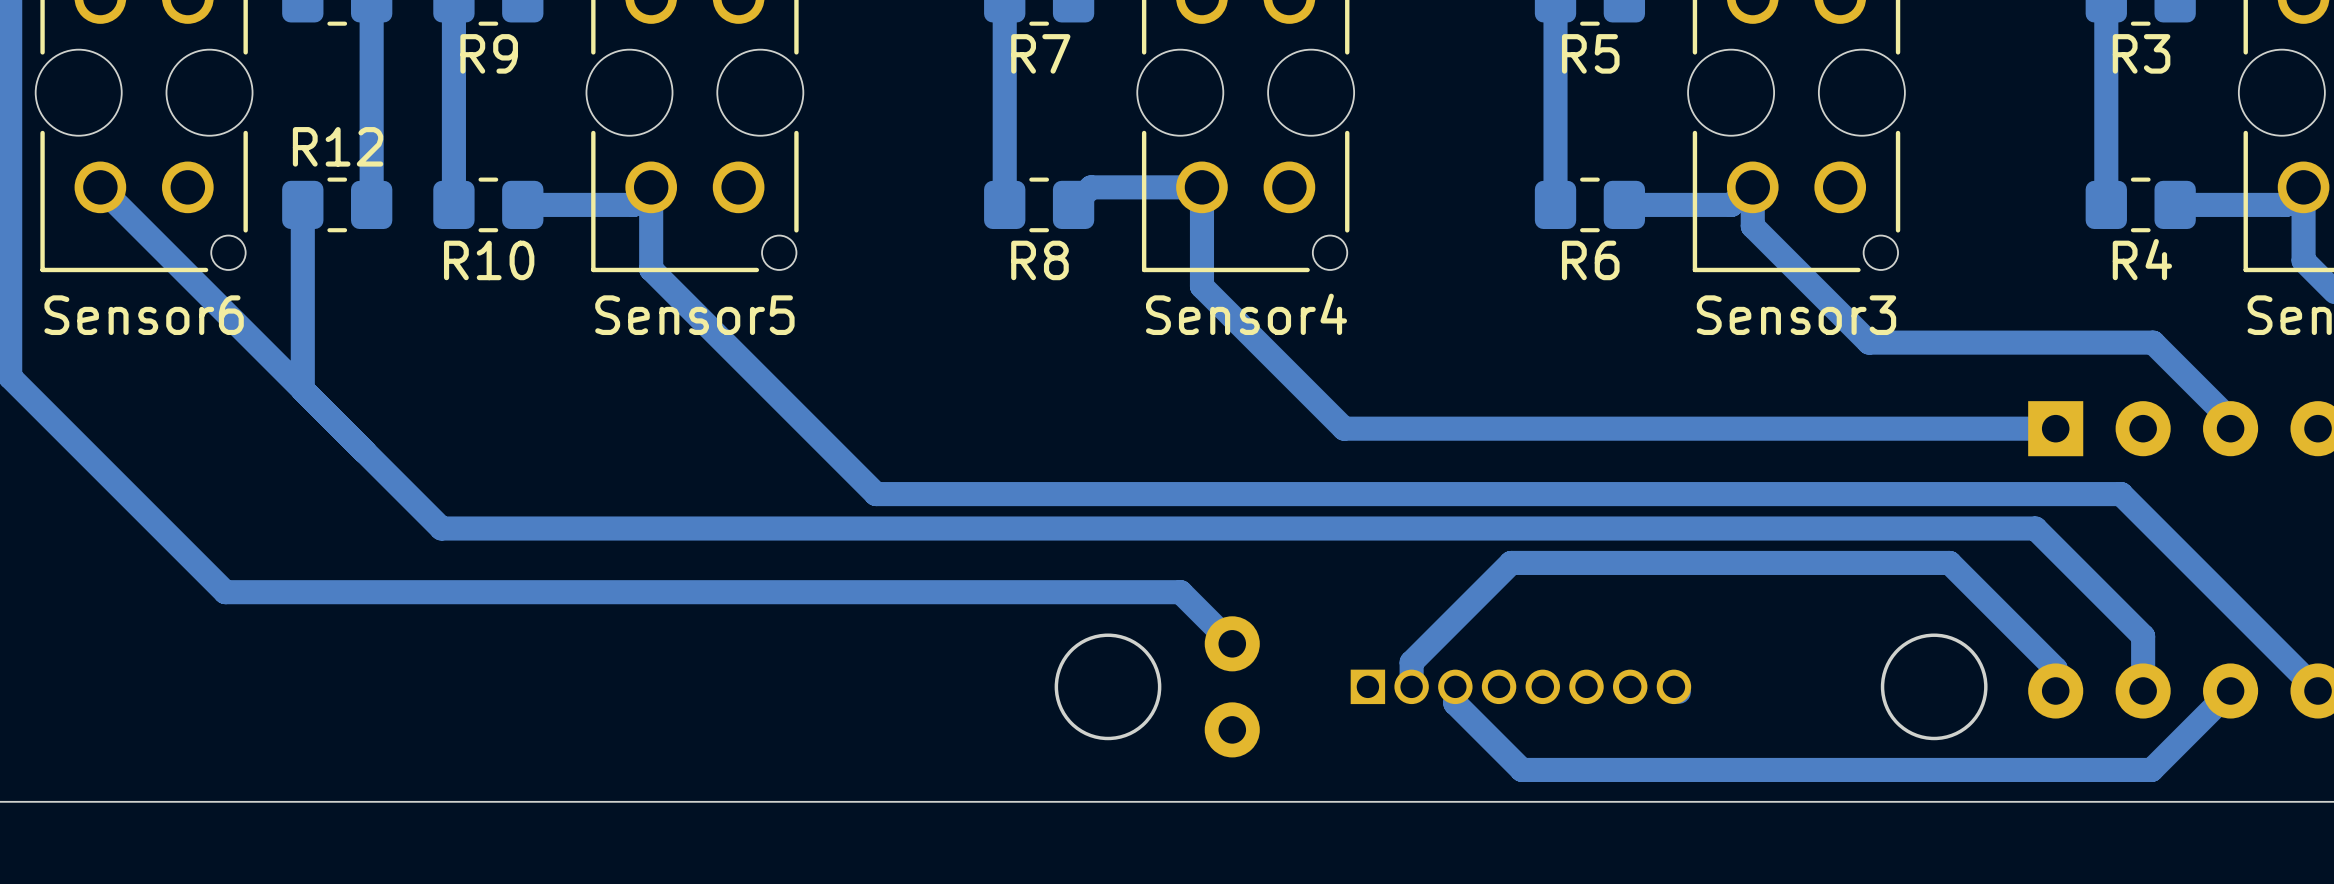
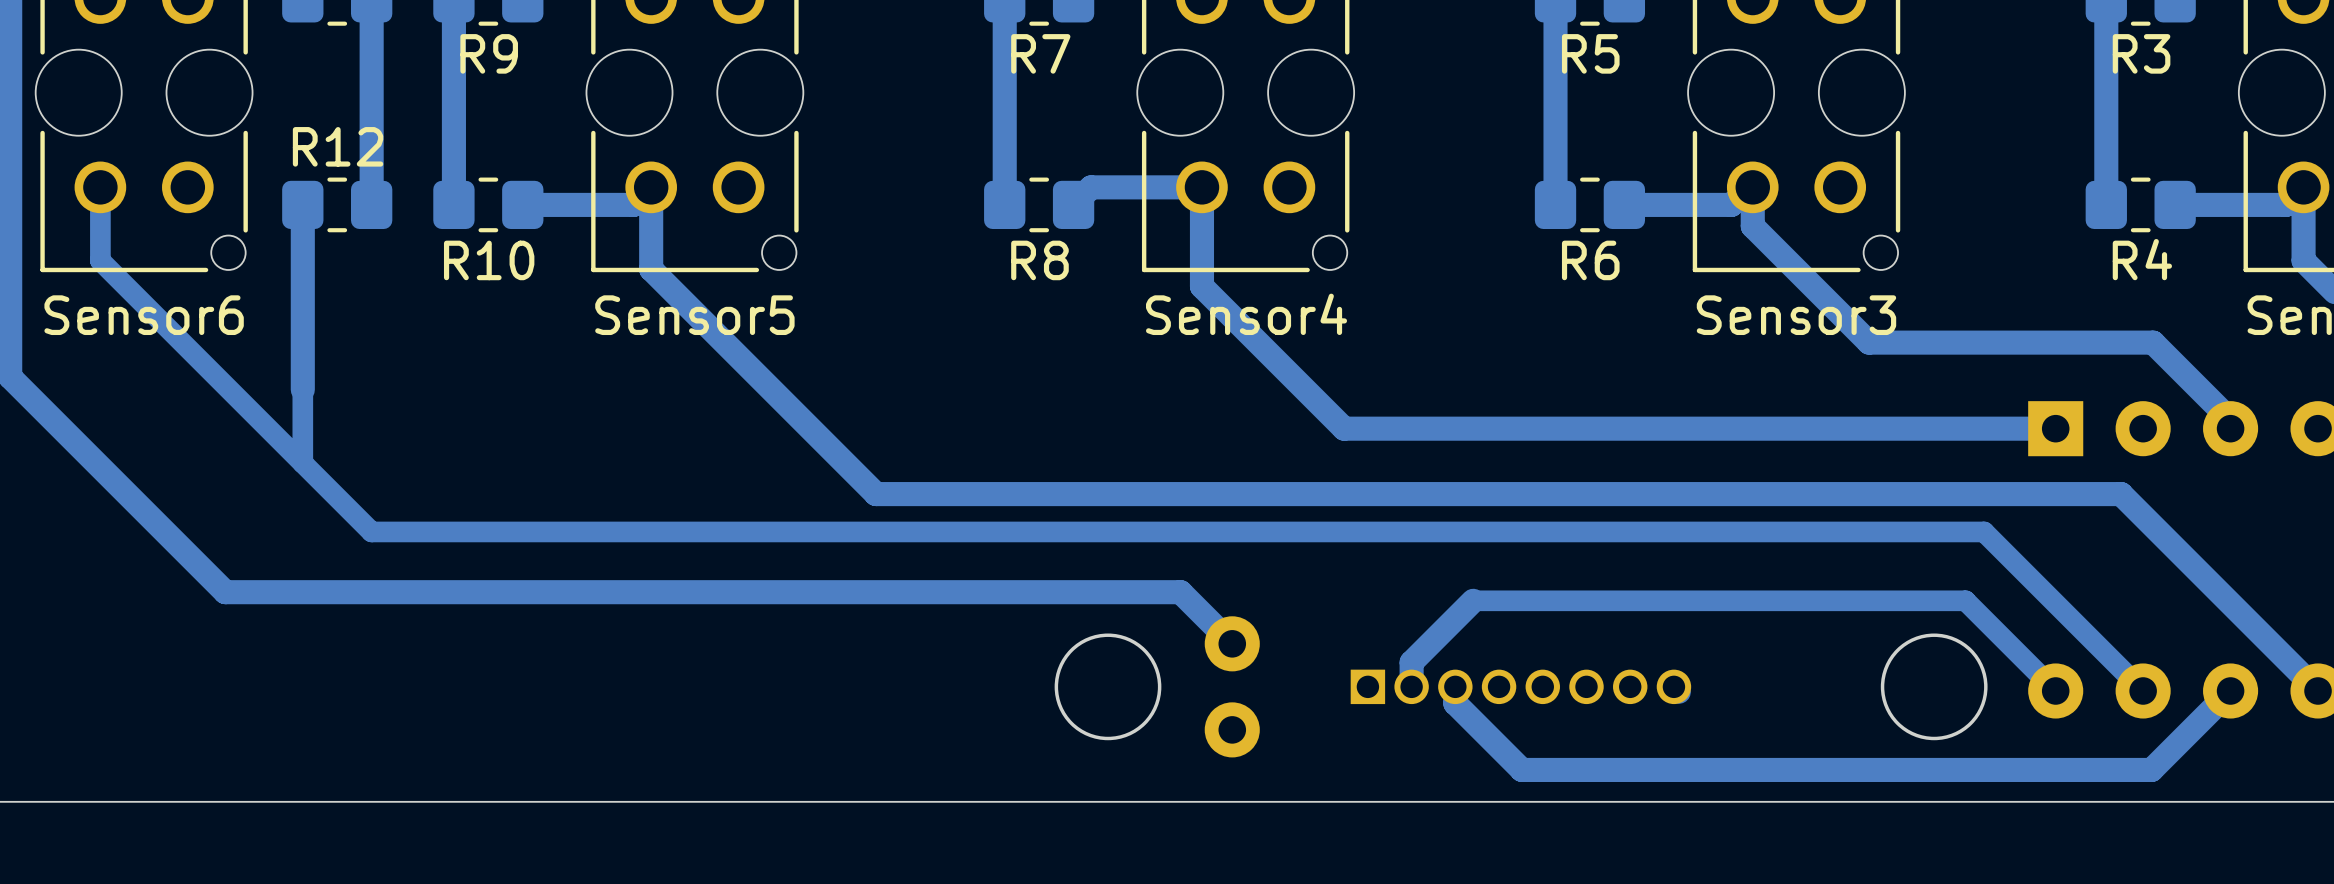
track: (100, 187) (441, 528) (2035, 528) (2143, 636) (2143, 690) -> (100, 187) (100, 260) (371, 531) (1984, 531) (2143, 690)
track: none -> (302, 389) (302, 463)
track: (1473, 600) (1511, 562) (1949, 562) (2055, 668) (2055, 690) -> (1473, 600) (1965, 600) (2055, 690)

